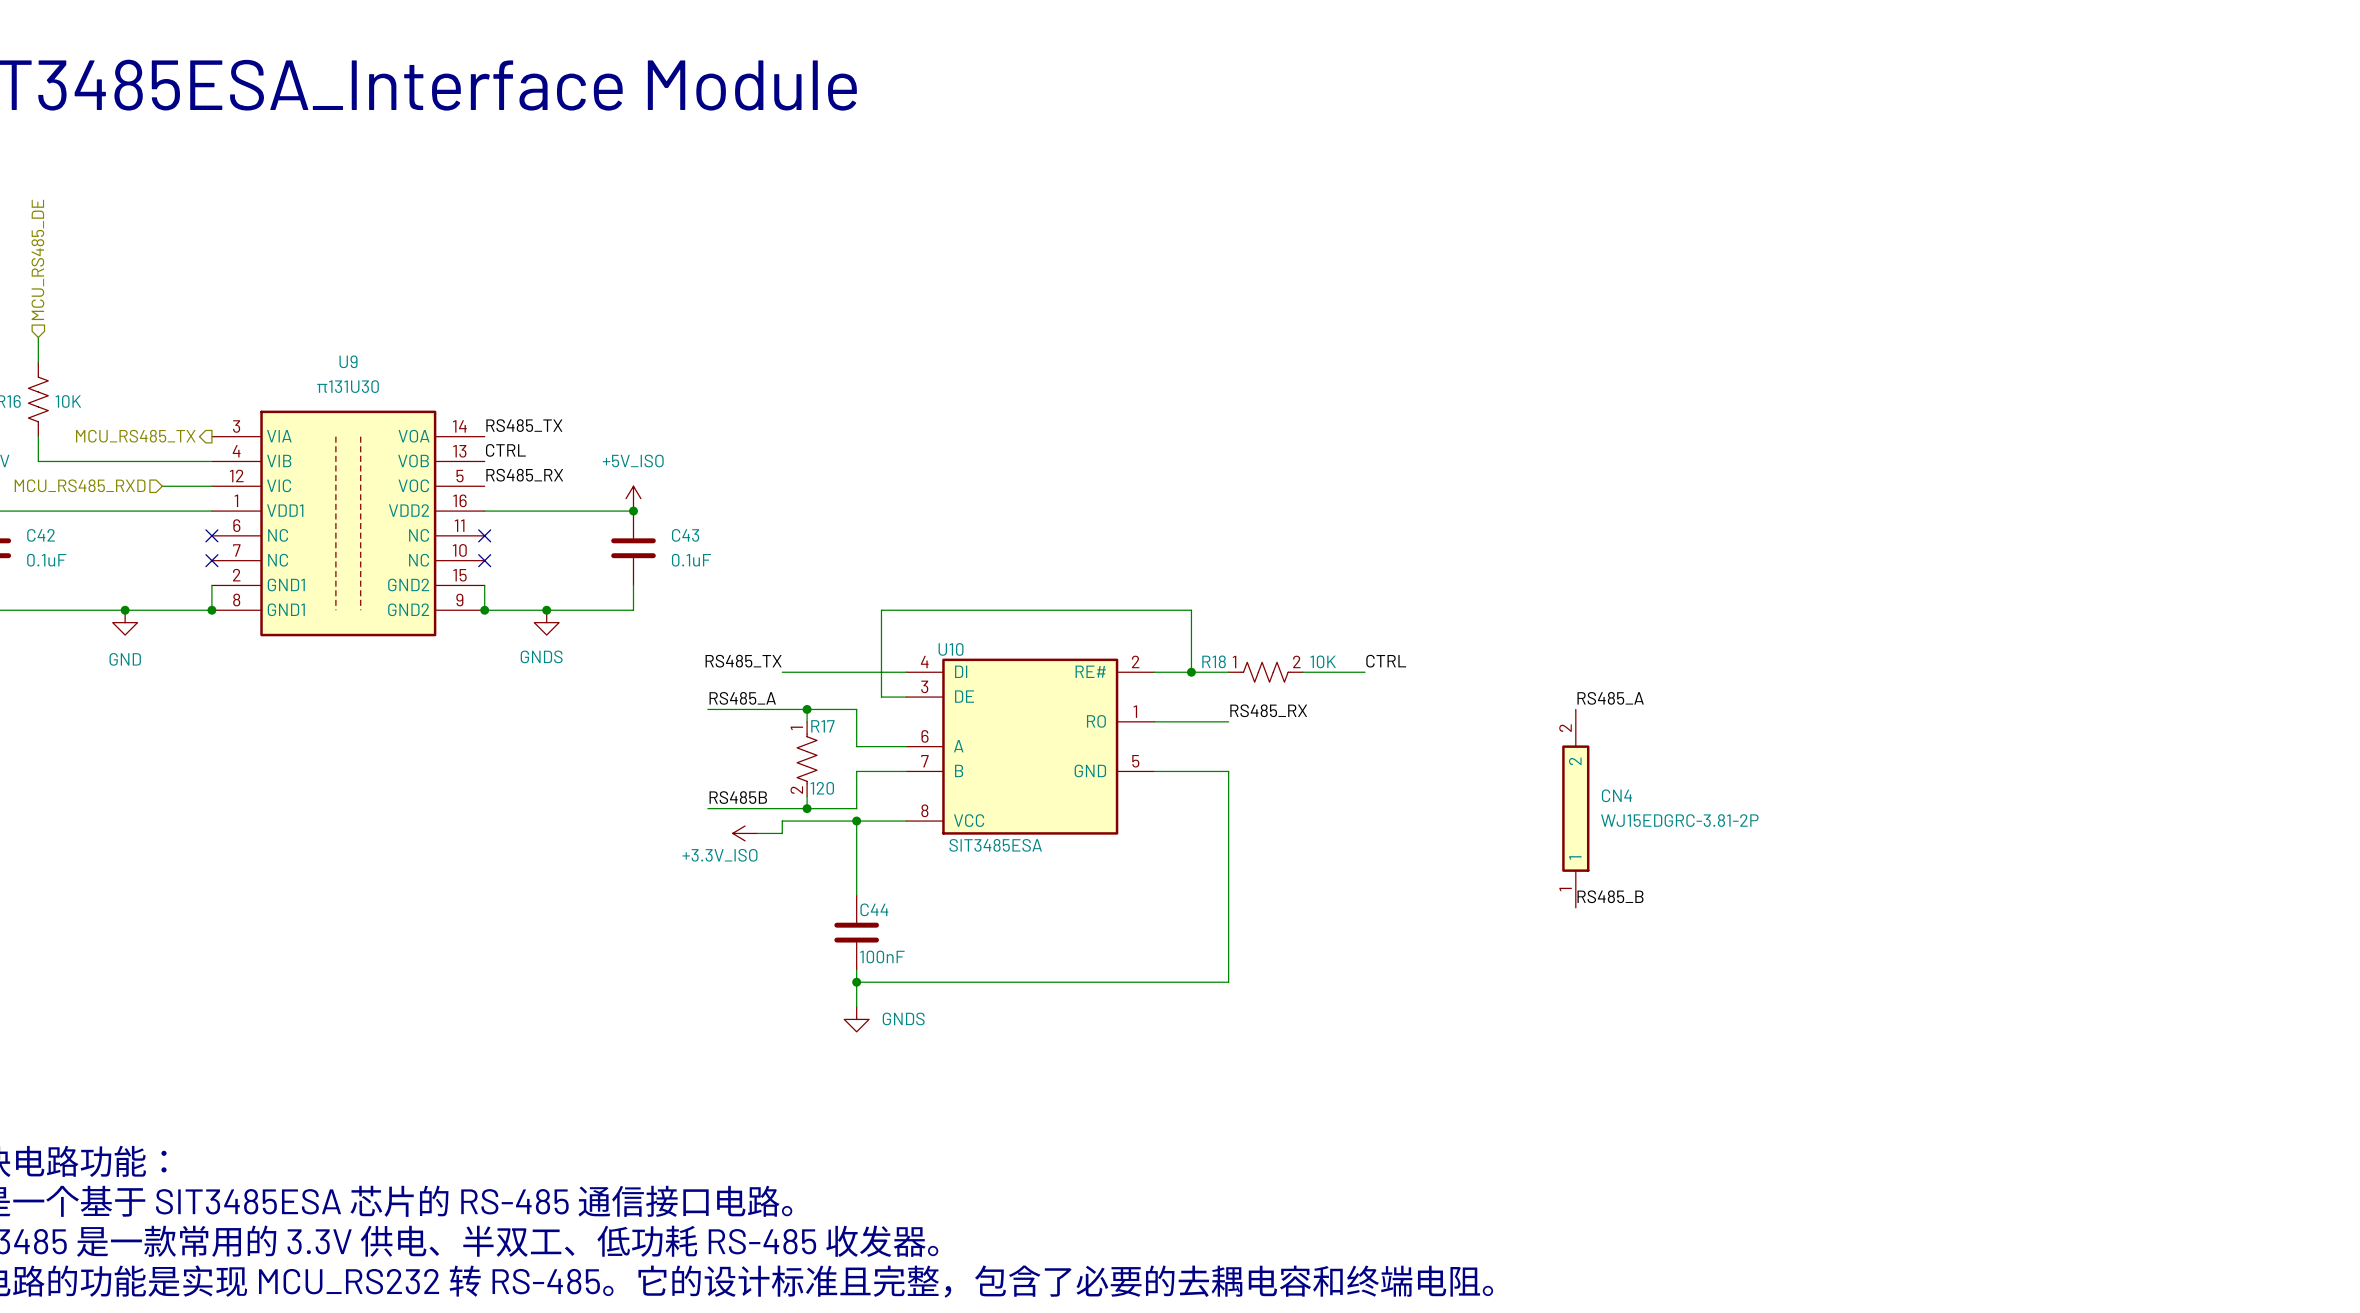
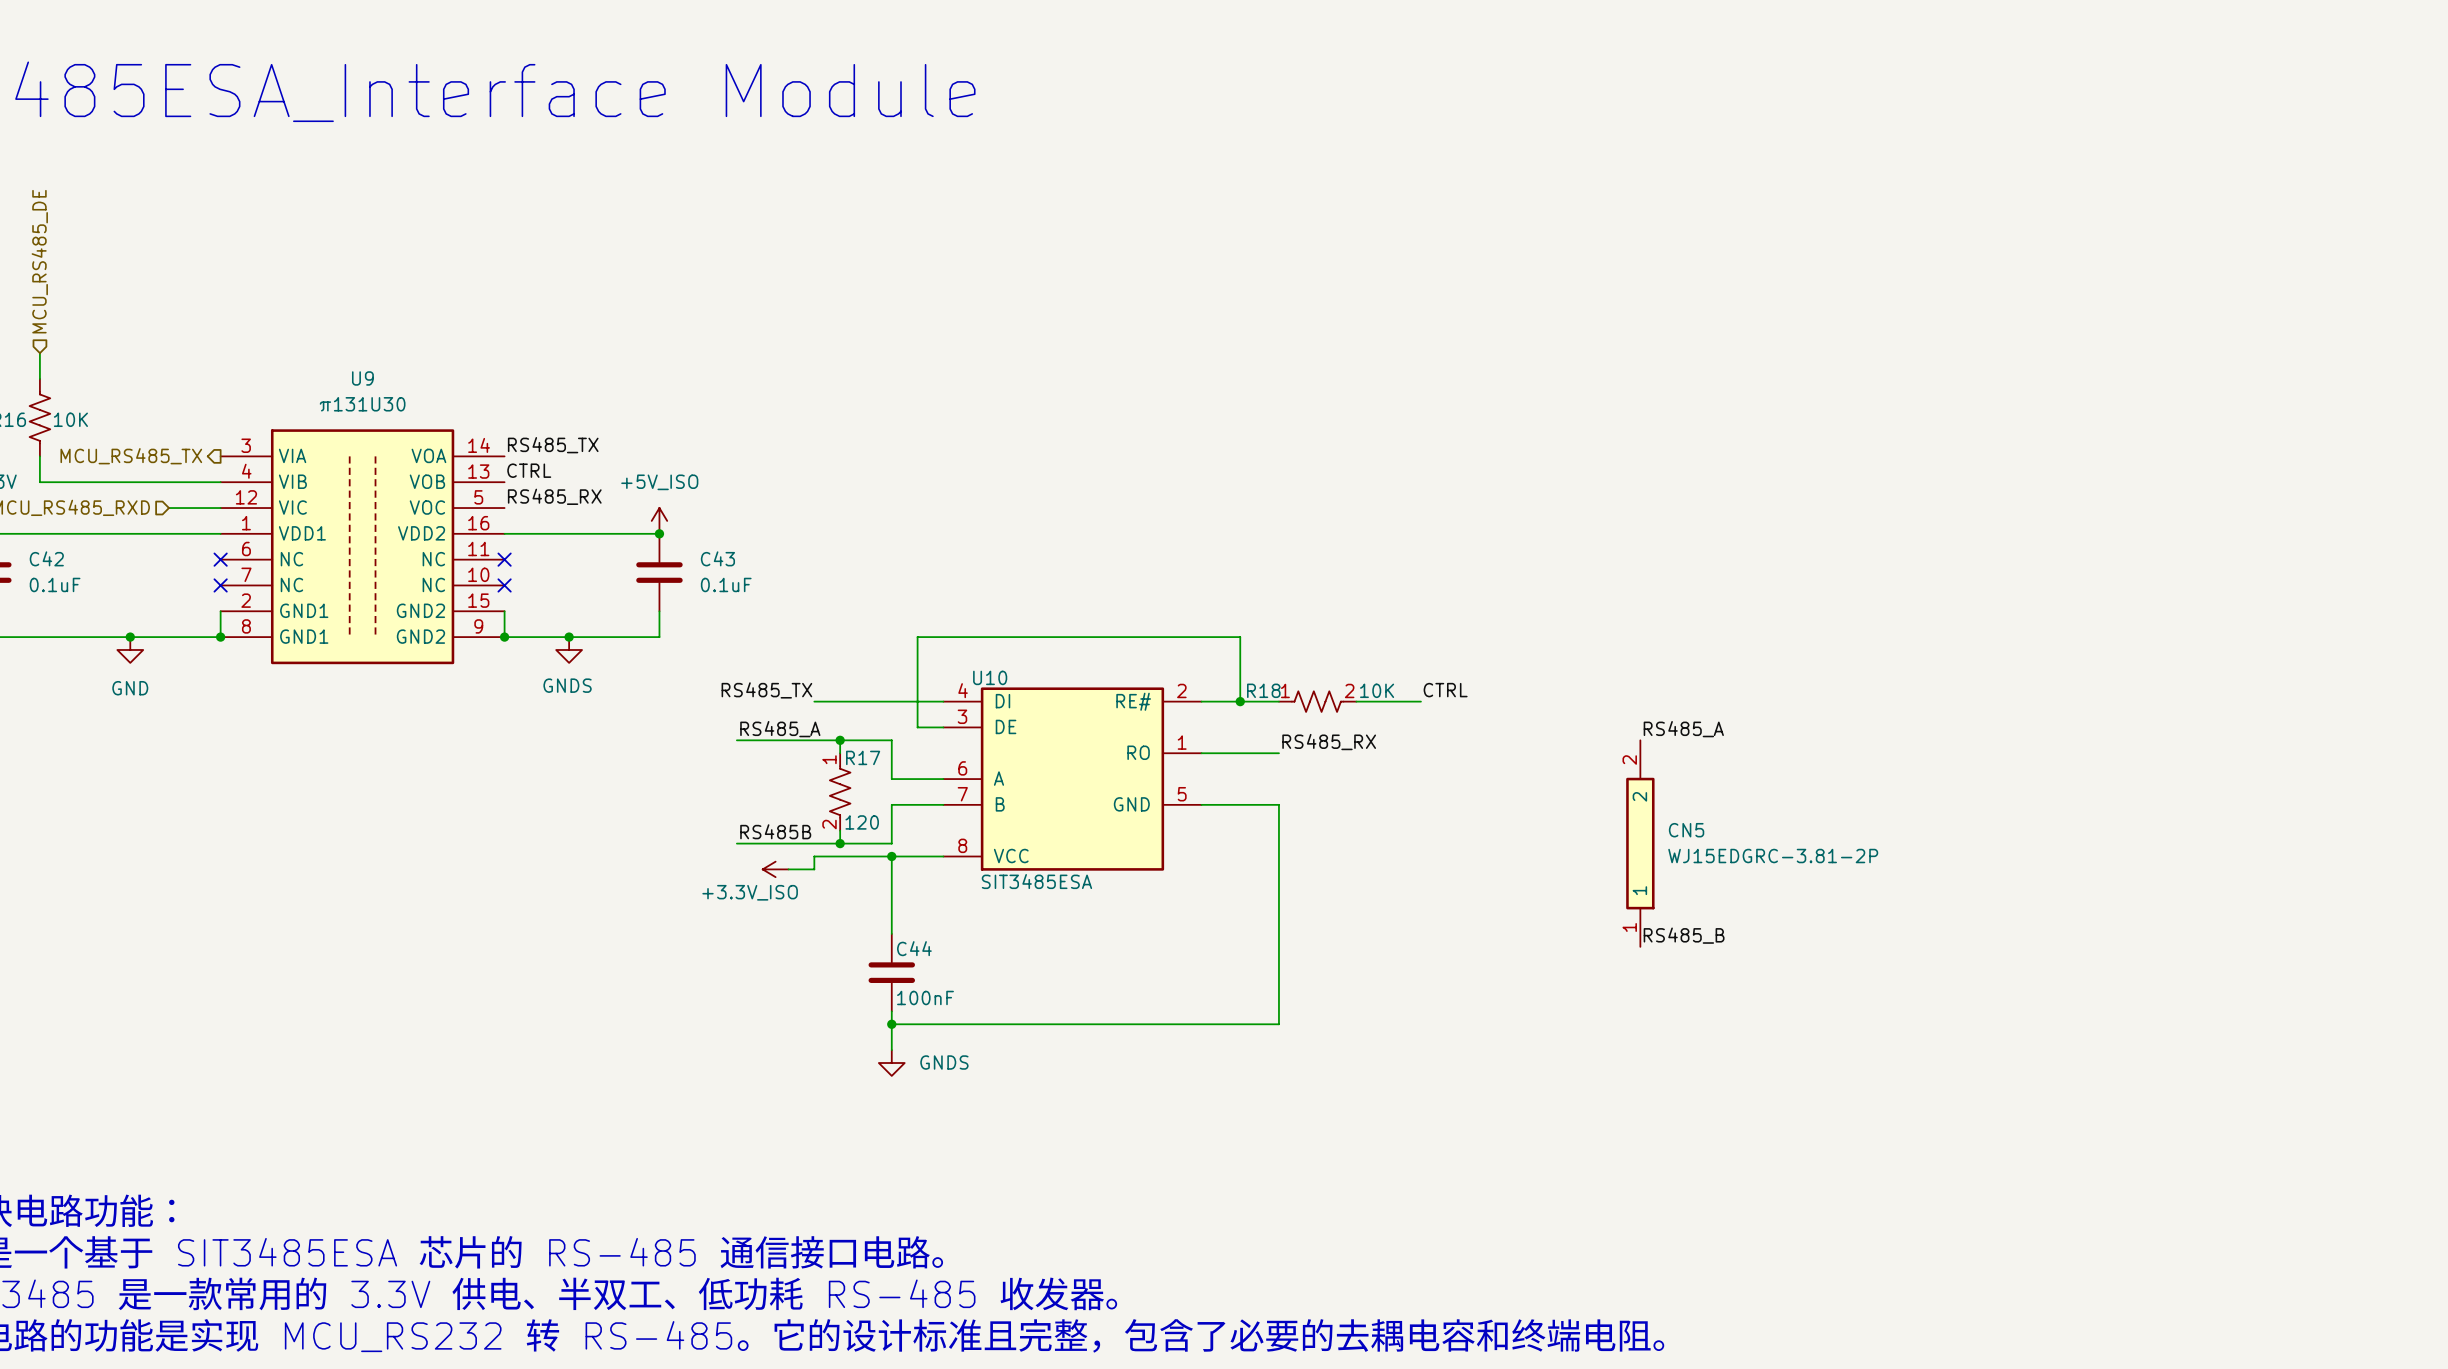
CN4 name: CN4 (1616, 795) -> CN5 (1686, 830)

